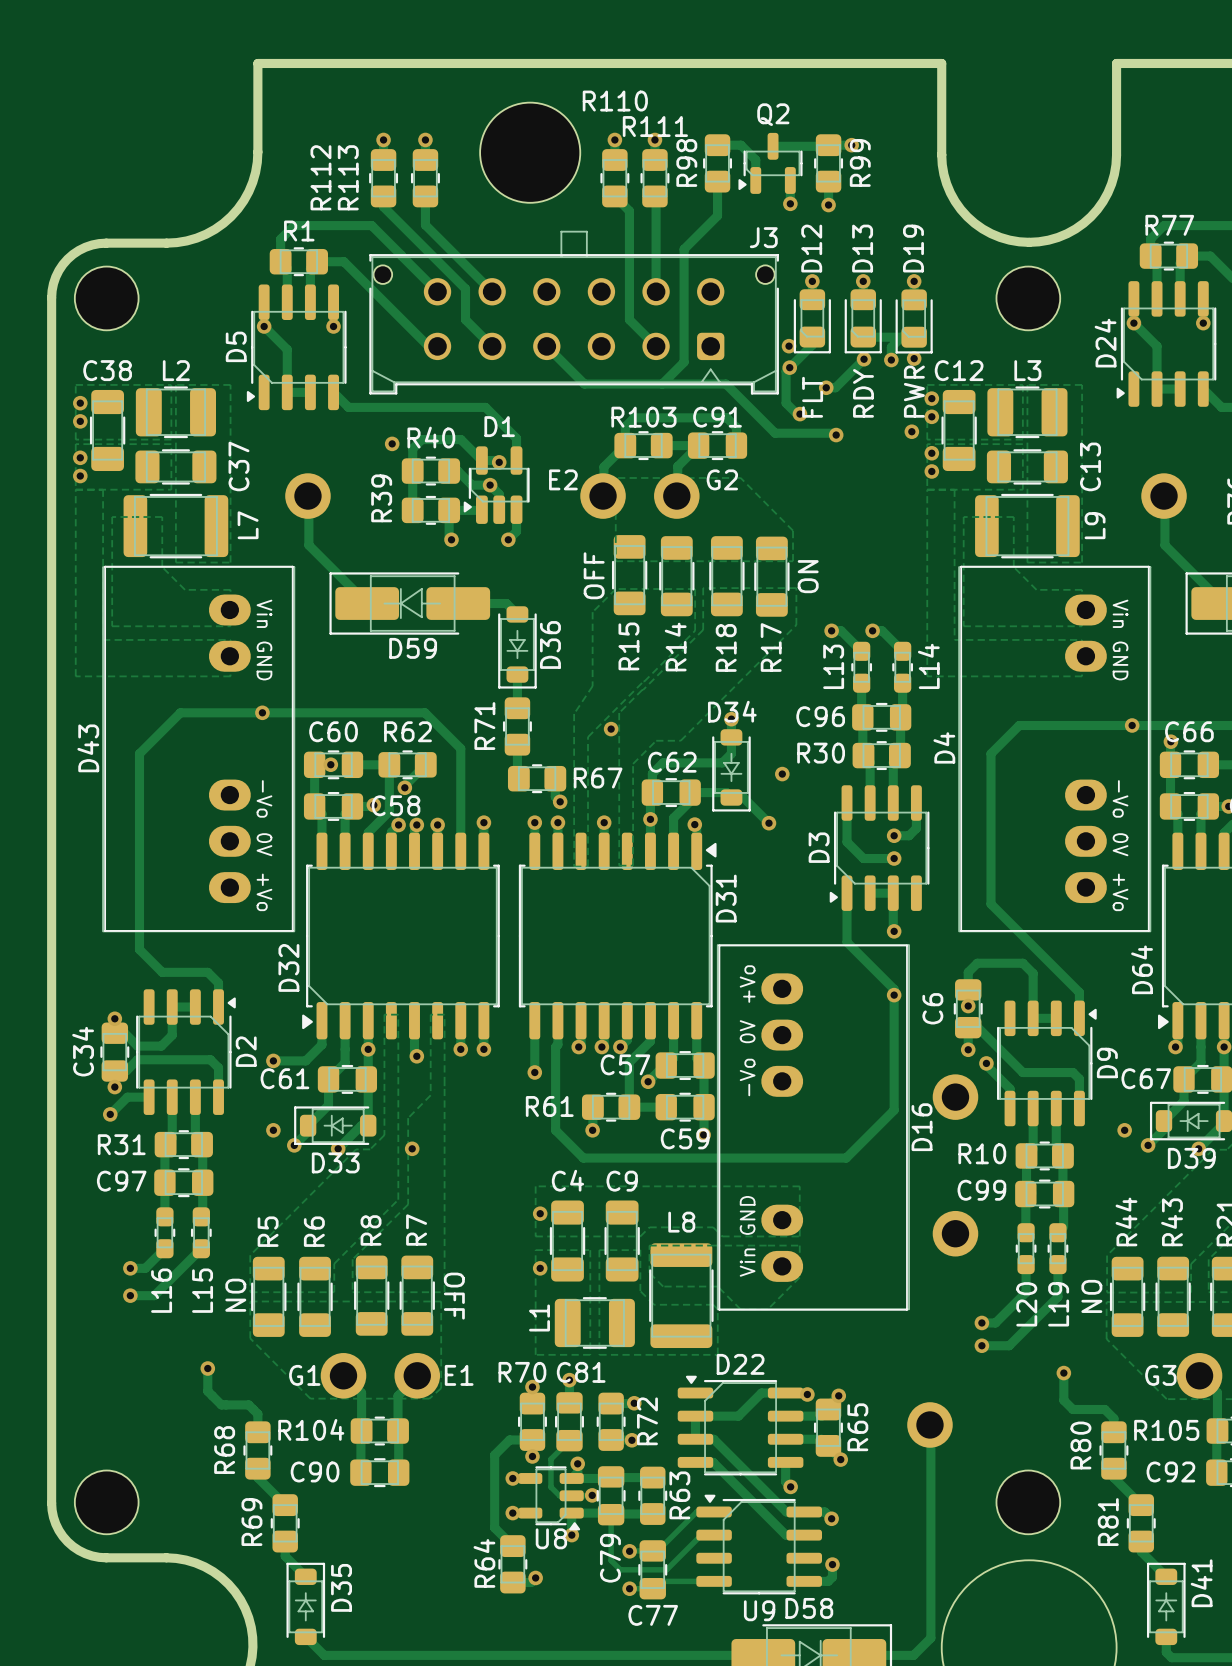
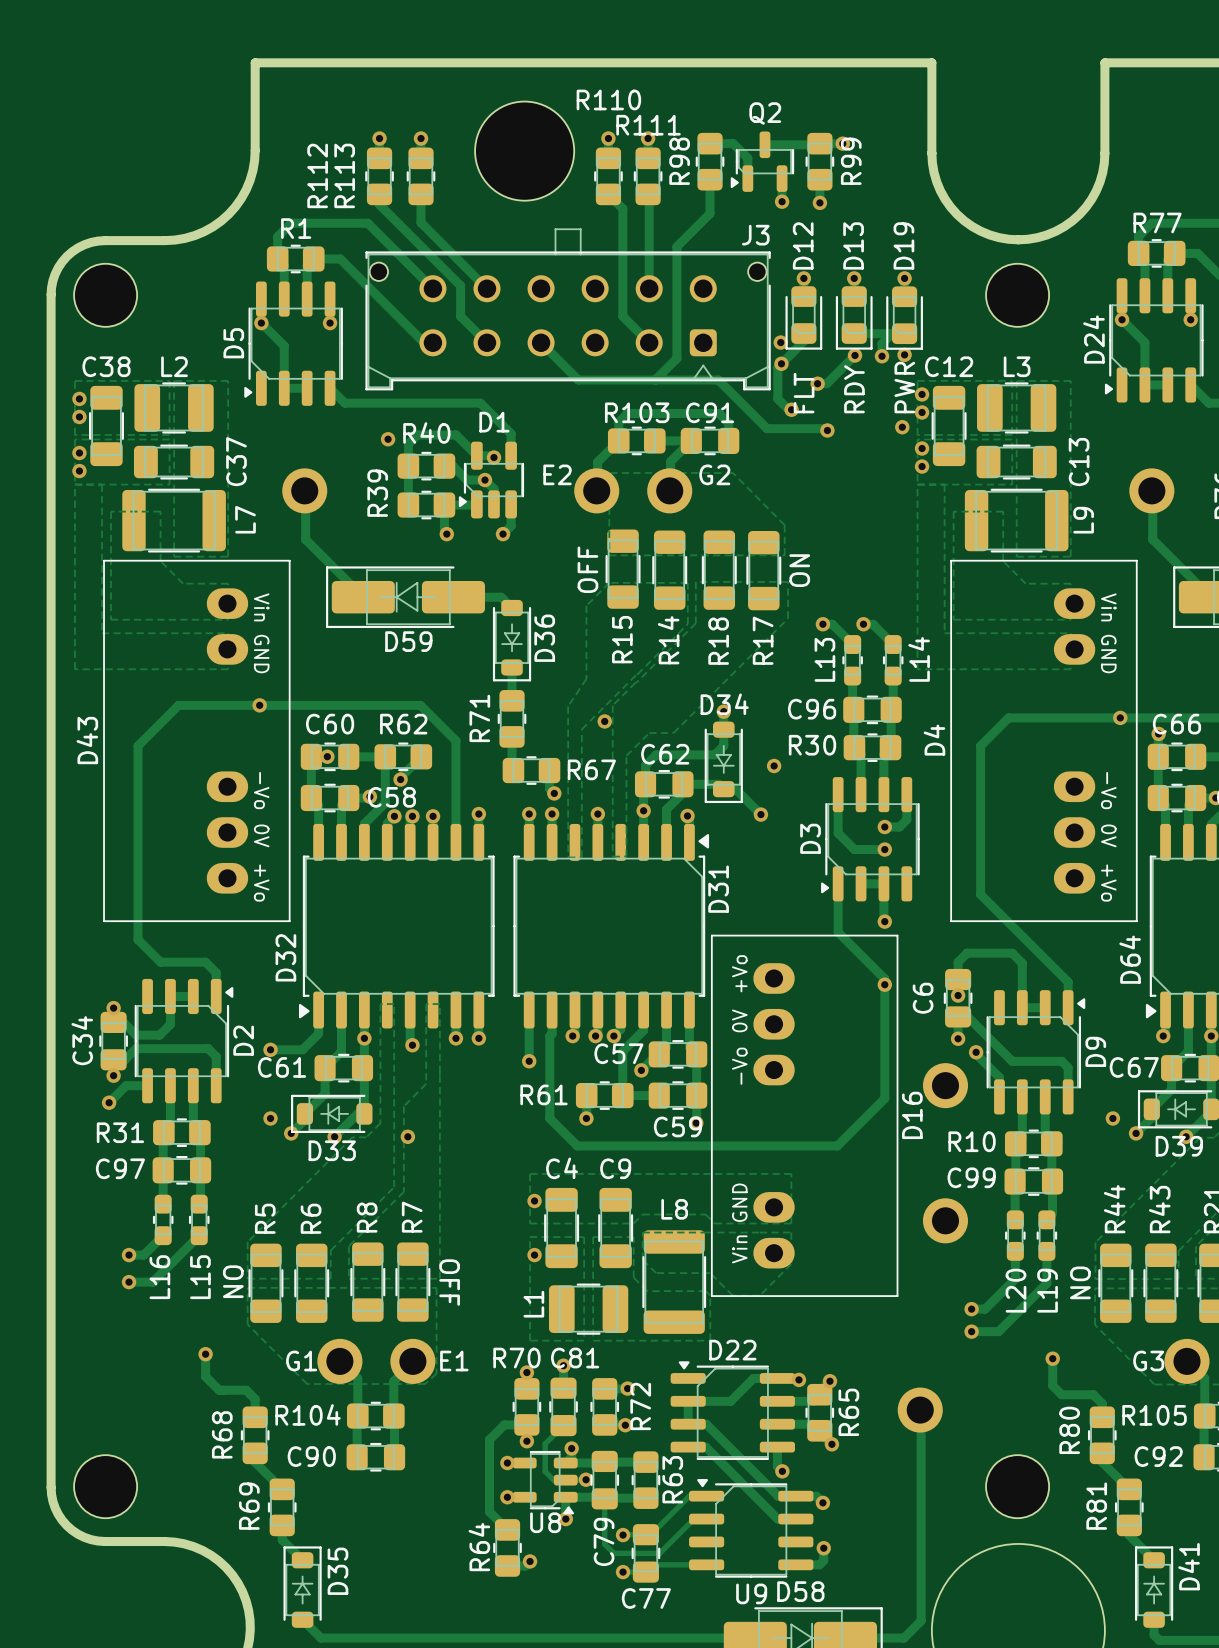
D43 footprint: [102, 565, 296, 933] -> [103, 559, 291, 923]
D4 footprint: [958, 565, 1152, 933] -> [950, 559, 1138, 923]
D16 footprint: [716, 944, 910, 1311] -> [710, 934, 899, 1297]

